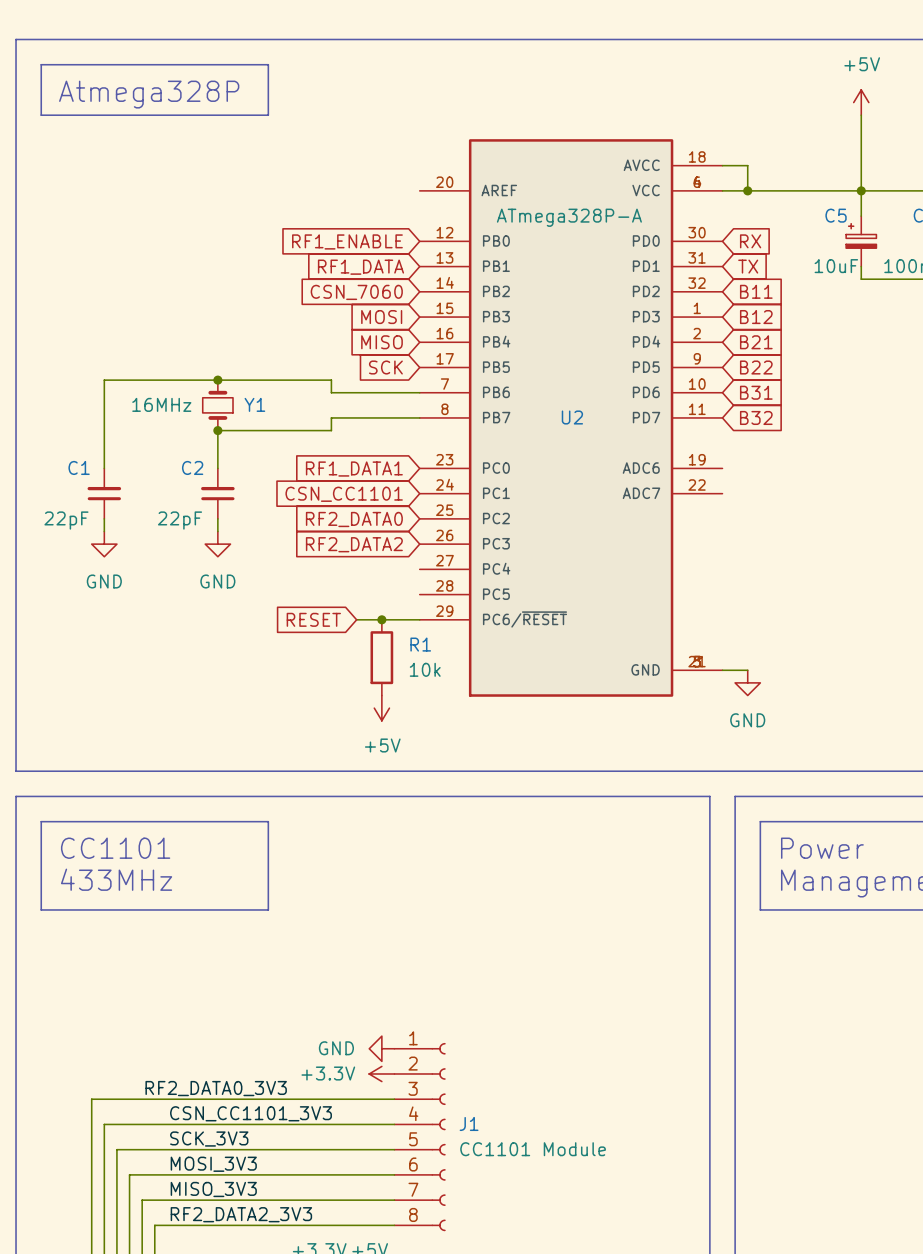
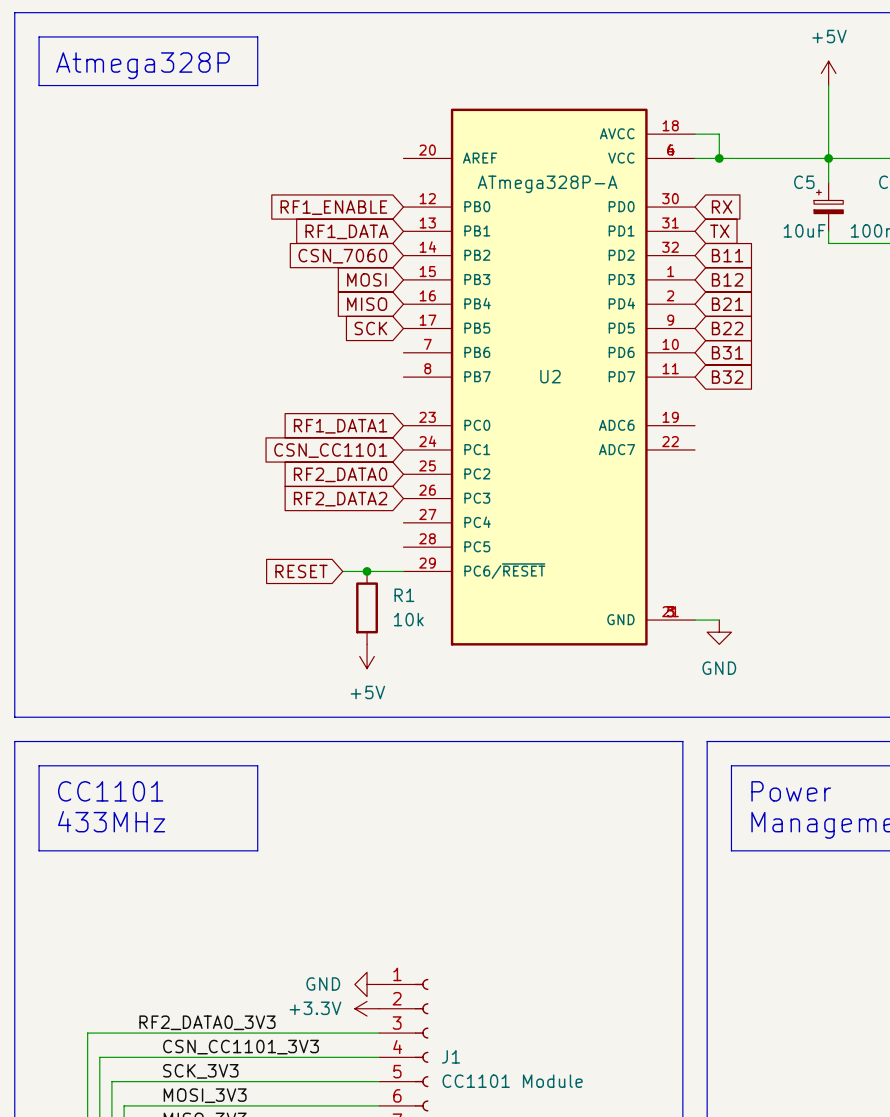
junction: (217, 380) -> none
wire: (419, 392) (331, 392) (331, 380) (104, 380) (104, 468) -> none
Y1: 16MHz (217, 405) -> none
wire: (419, 417) (331, 417) (331, 430) (217, 430) (217, 468) -> none
junction: (217, 430) -> none
C1: 22pF (104, 493) -> none
C2: 22pF (217, 493) -> none
wire: (104, 518) (104, 531) -> none
wire: (217, 518) (217, 531) -> none
power symbol: GND (104, 544) -> none
power symbol: GND (217, 544) -> none

